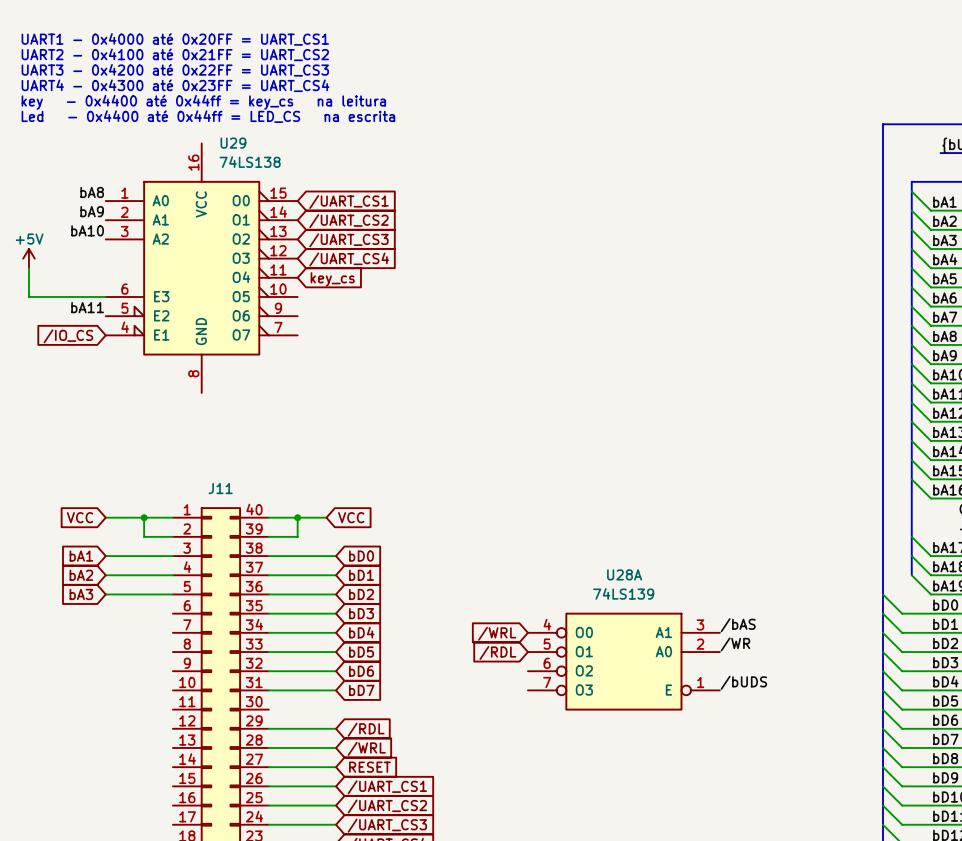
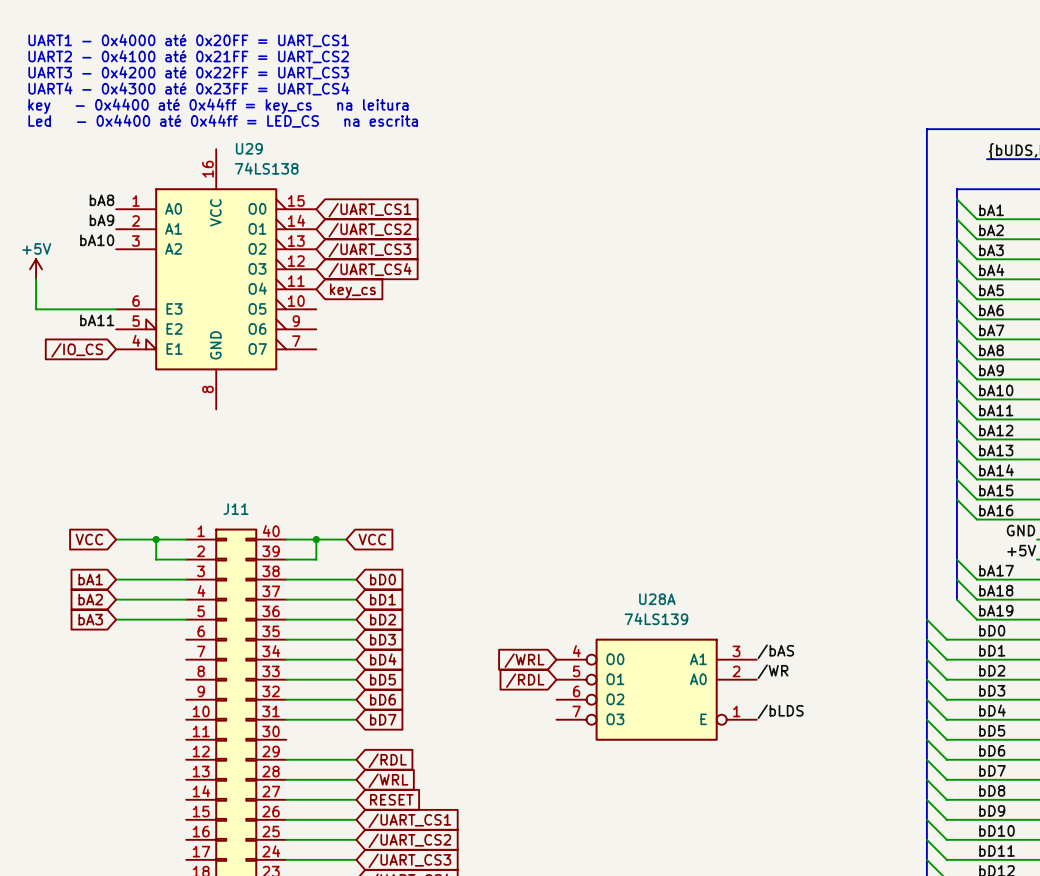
label: /bUDS (743, 682) -> /bLDS (780, 711)

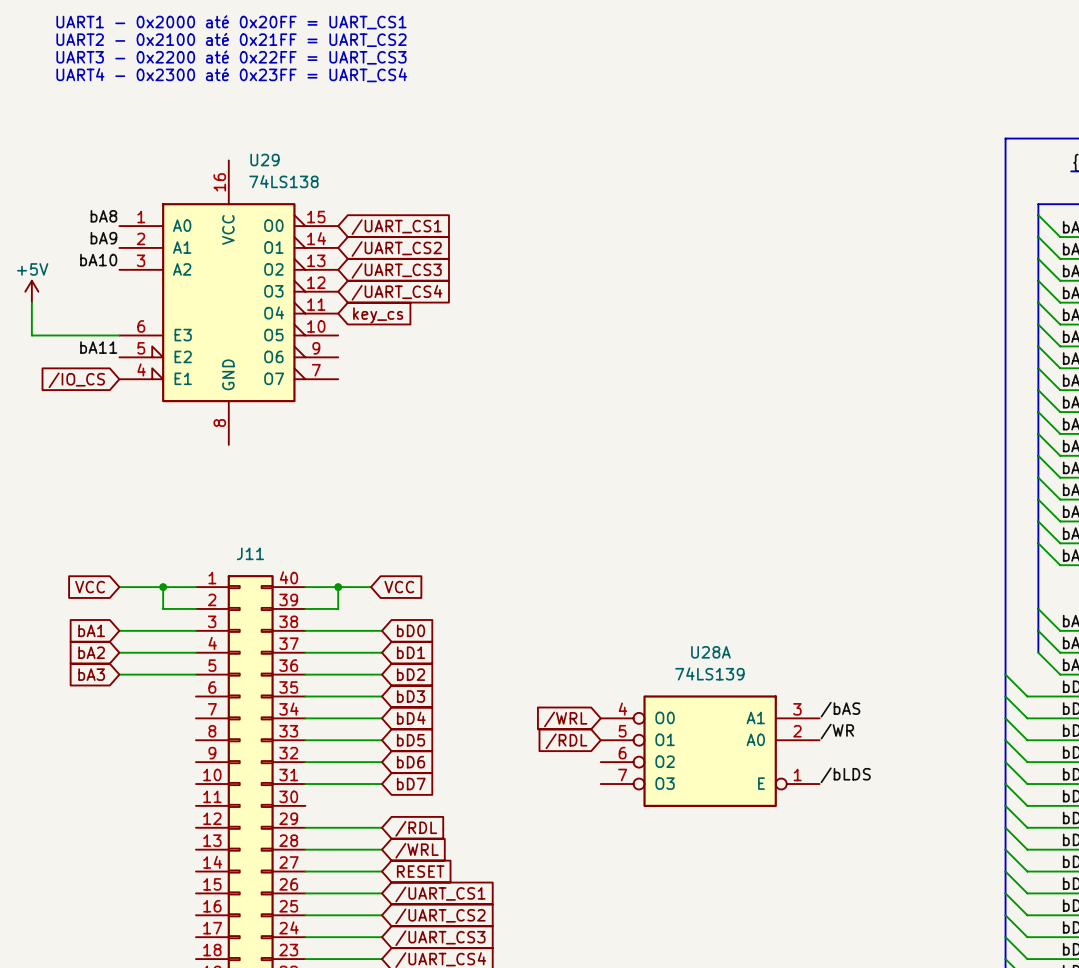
text: none -> UART1 - 0x2000 até 0x20FF = UART_CS1 (231, 22)
text: none -> UART2 - 0x2100 até 0x21FF = UART_CS2 (231, 39)
text: UART1 - 0x4000 até 0x20FF = UART_CS1 (188, 40) -> none
text: none -> UART3 - 0x2200 até 0x22FF = UART_CS3 (231, 57)
text: UART2 - 0x4100 até 0x21FF = UART_CS2 (188, 56) -> none
text: none -> UART4 - 0x2300 até 0x23FF = UART_CS4 (231, 75)
text: UART3 - 0x4200 até 0x22FF = UART_CS3 (188, 72) -> none
text: UART4 - 0x4300 até 0x23FF = UART_CS4 (188, 88) -> none
text: key - 0x4400 até 0x44ff = key_cs na leitura (218, 106) -> none
text: Led - 0x4400 até 0x44ff = LED_CS na escrita (223, 121) -> none

